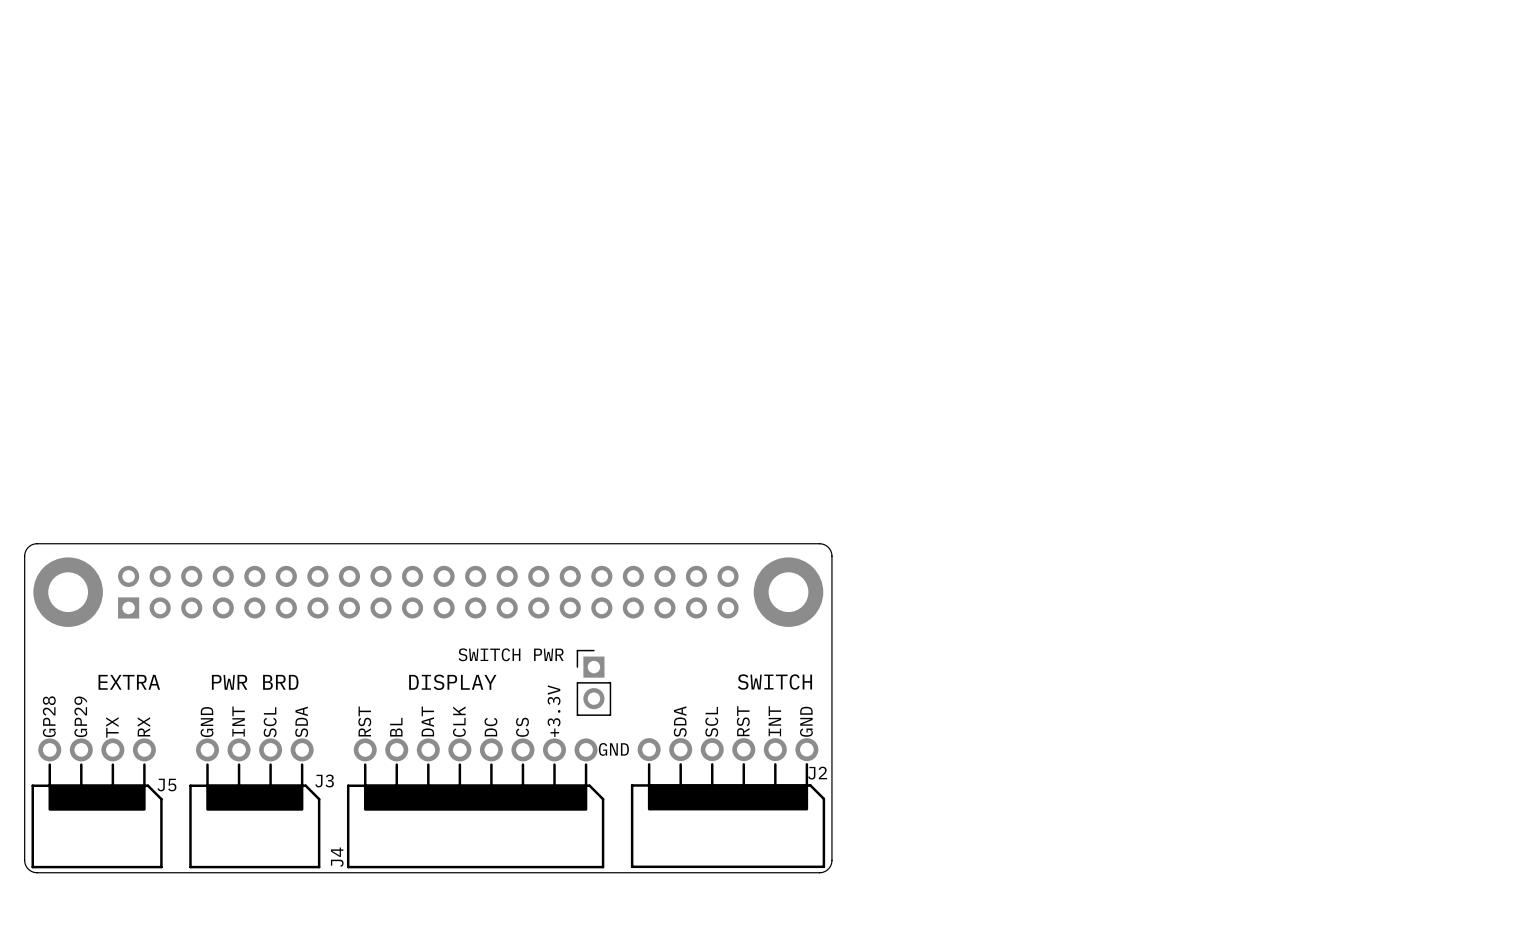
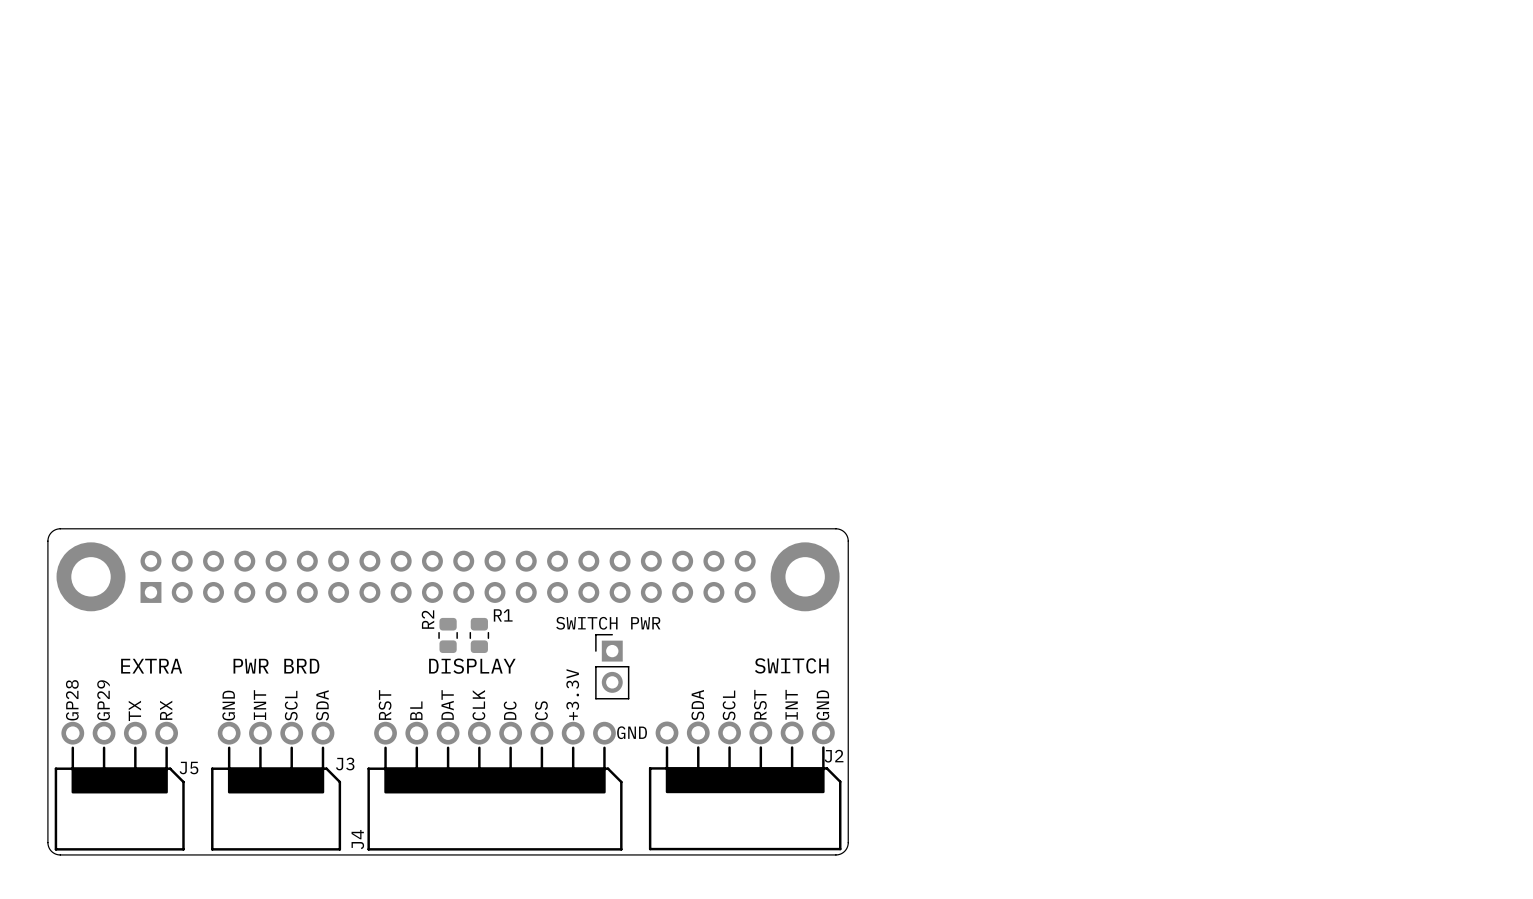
R2: none -> (448, 635)
R1: none -> (479, 635)
part value position: SWITCH PWR (511, 654) -> SWITCH PWR (608, 623)

